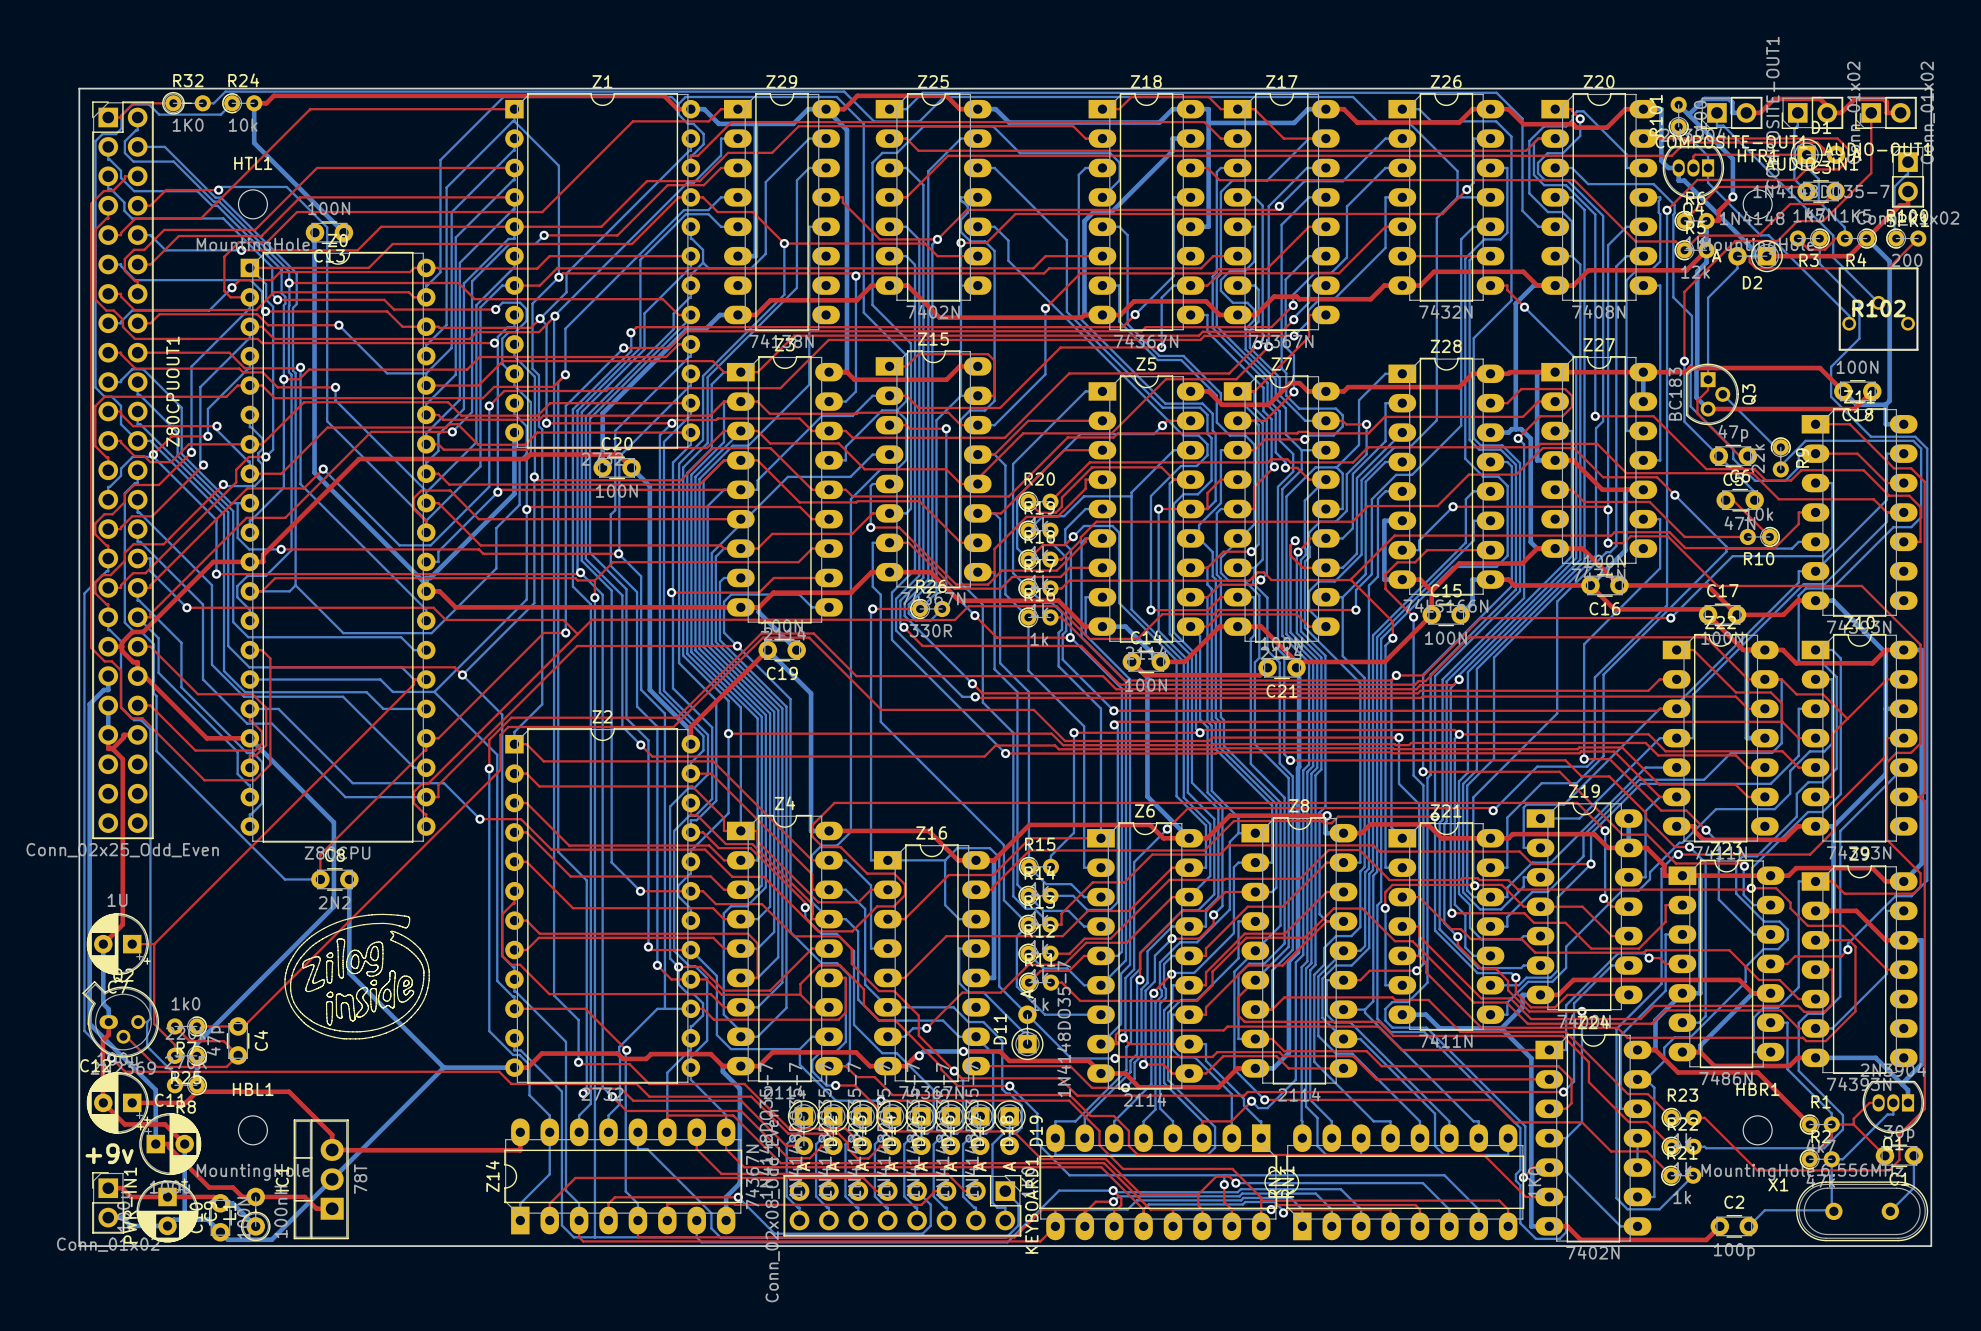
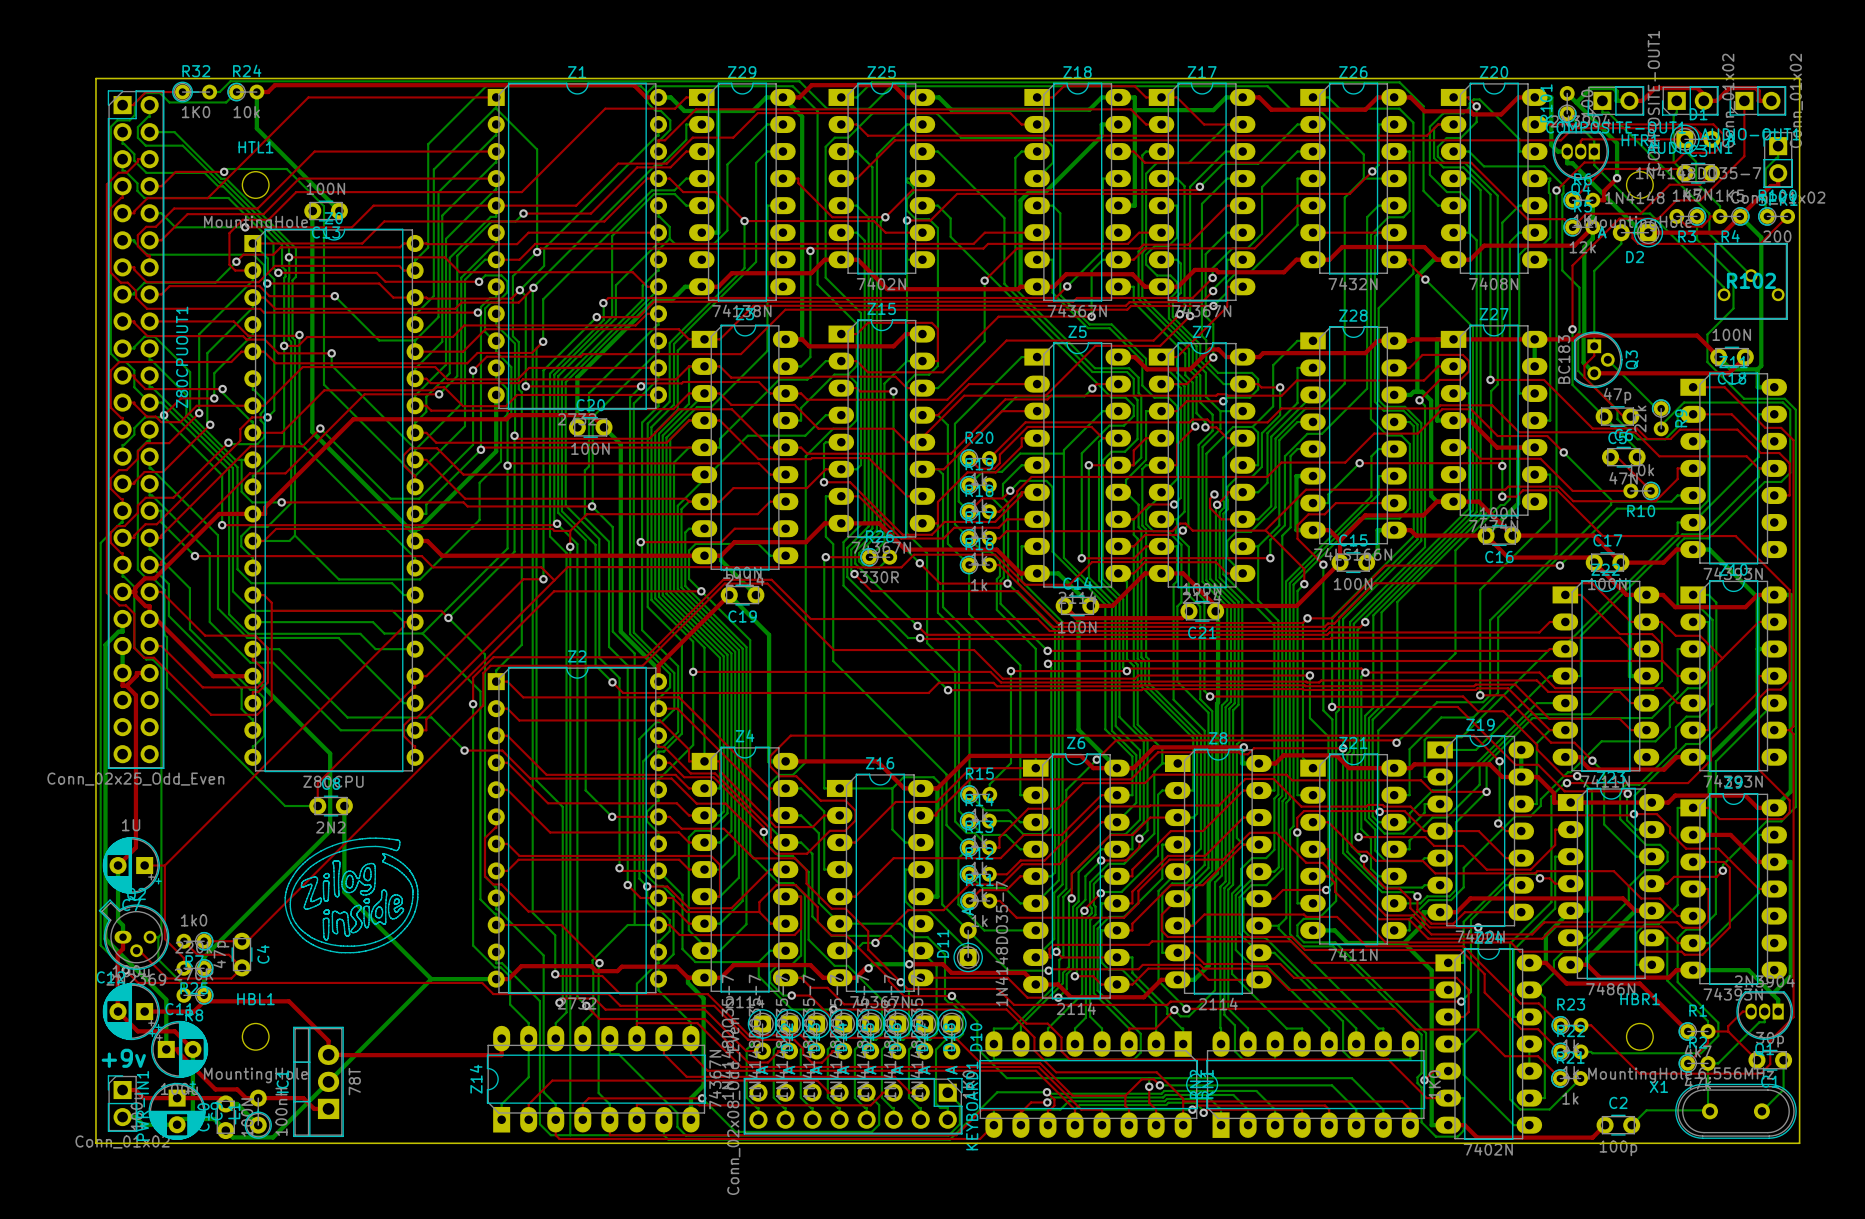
D19 name: D19 (1036, 1130) -> D10 (976, 1037)

